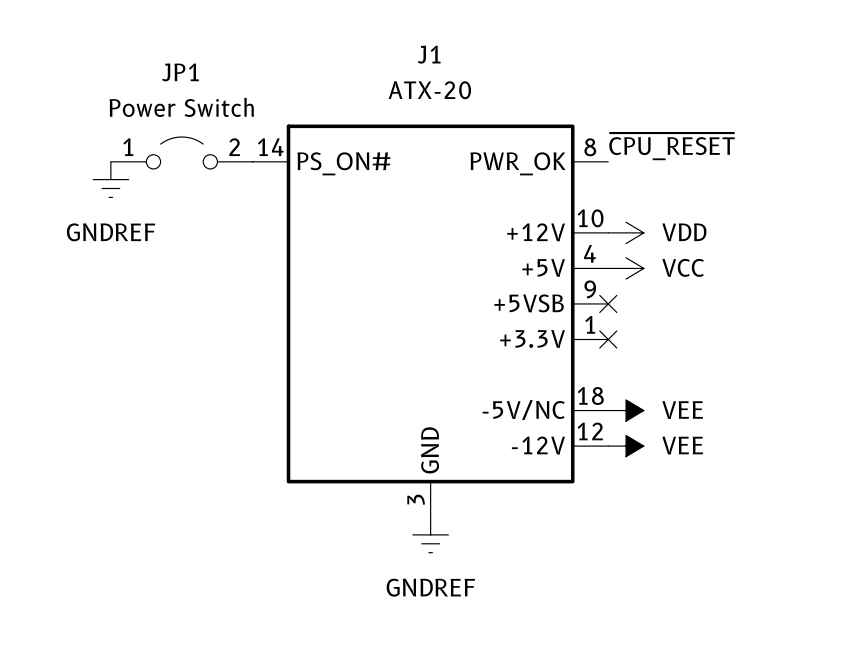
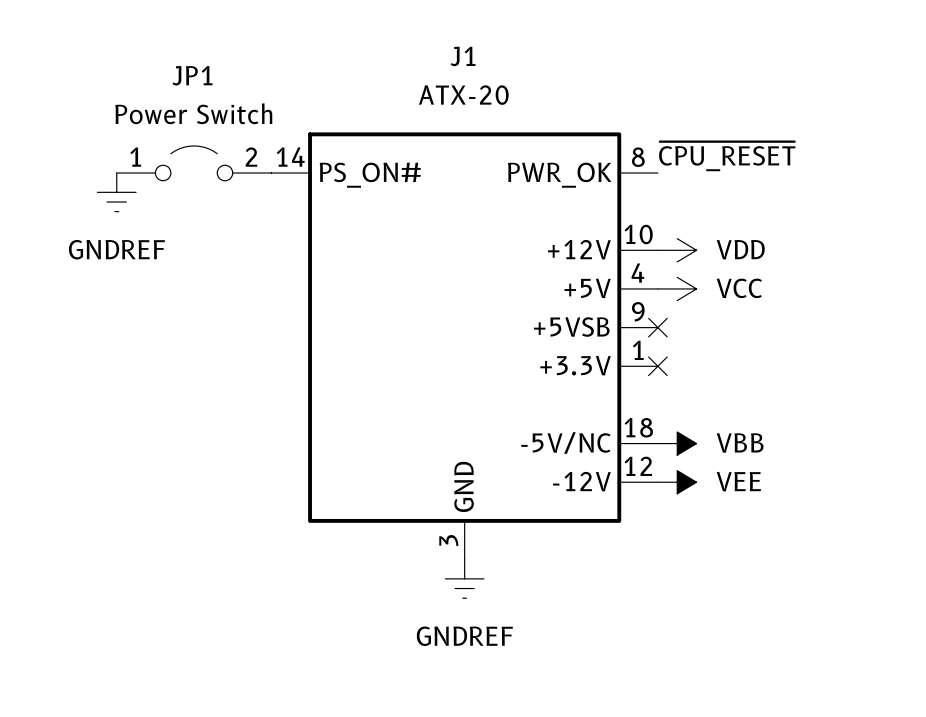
power symbol: VEE (626, 410) -> VBB (677, 443)

